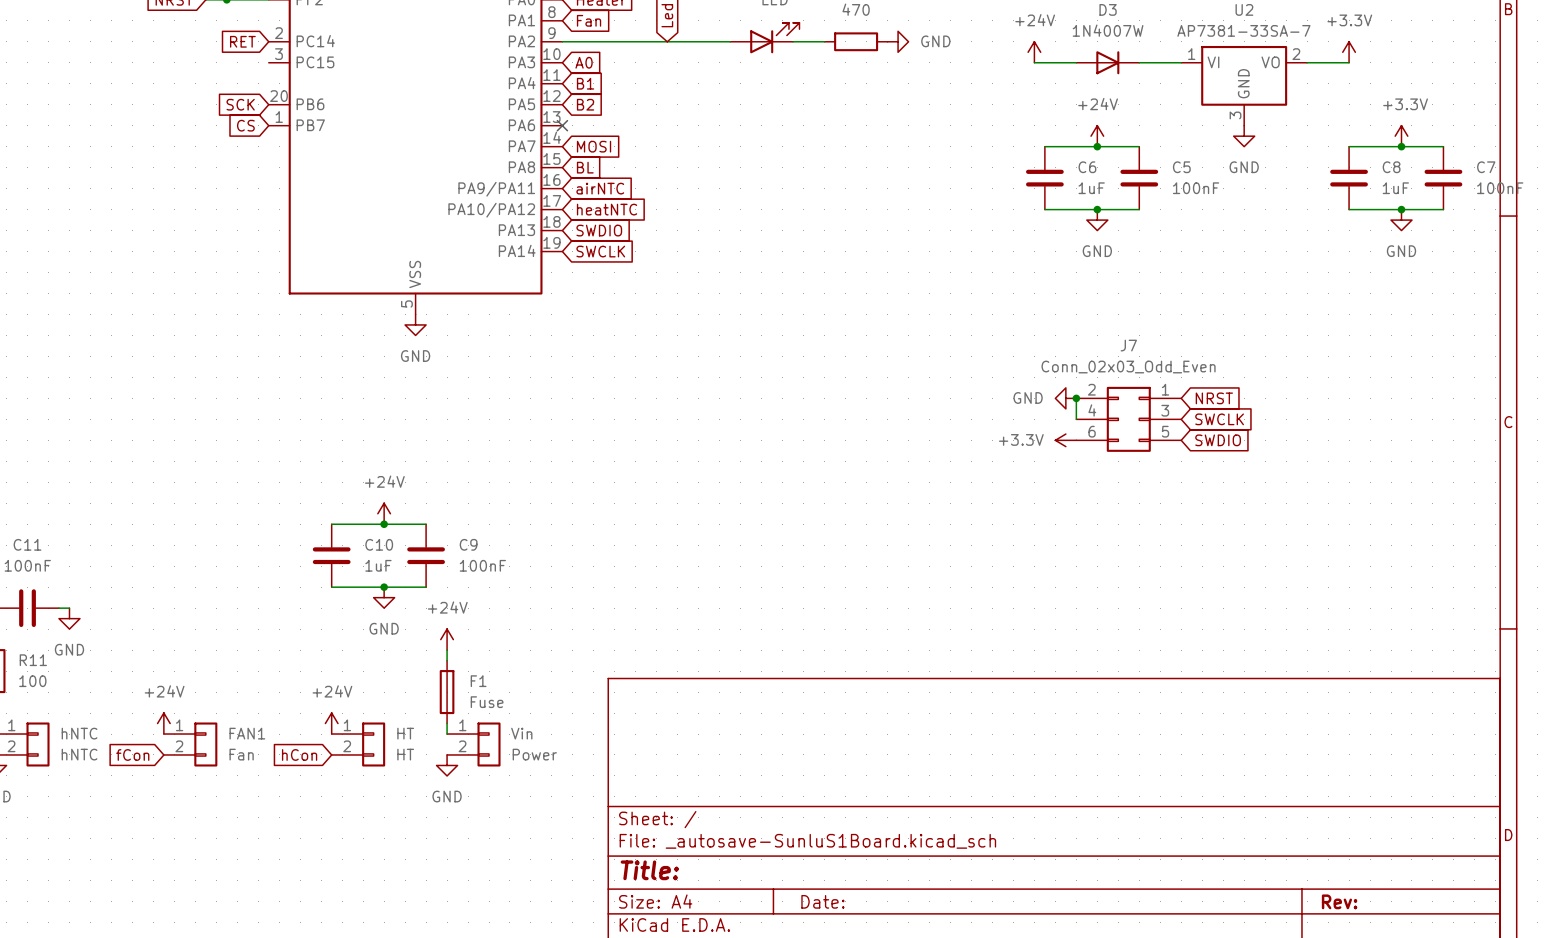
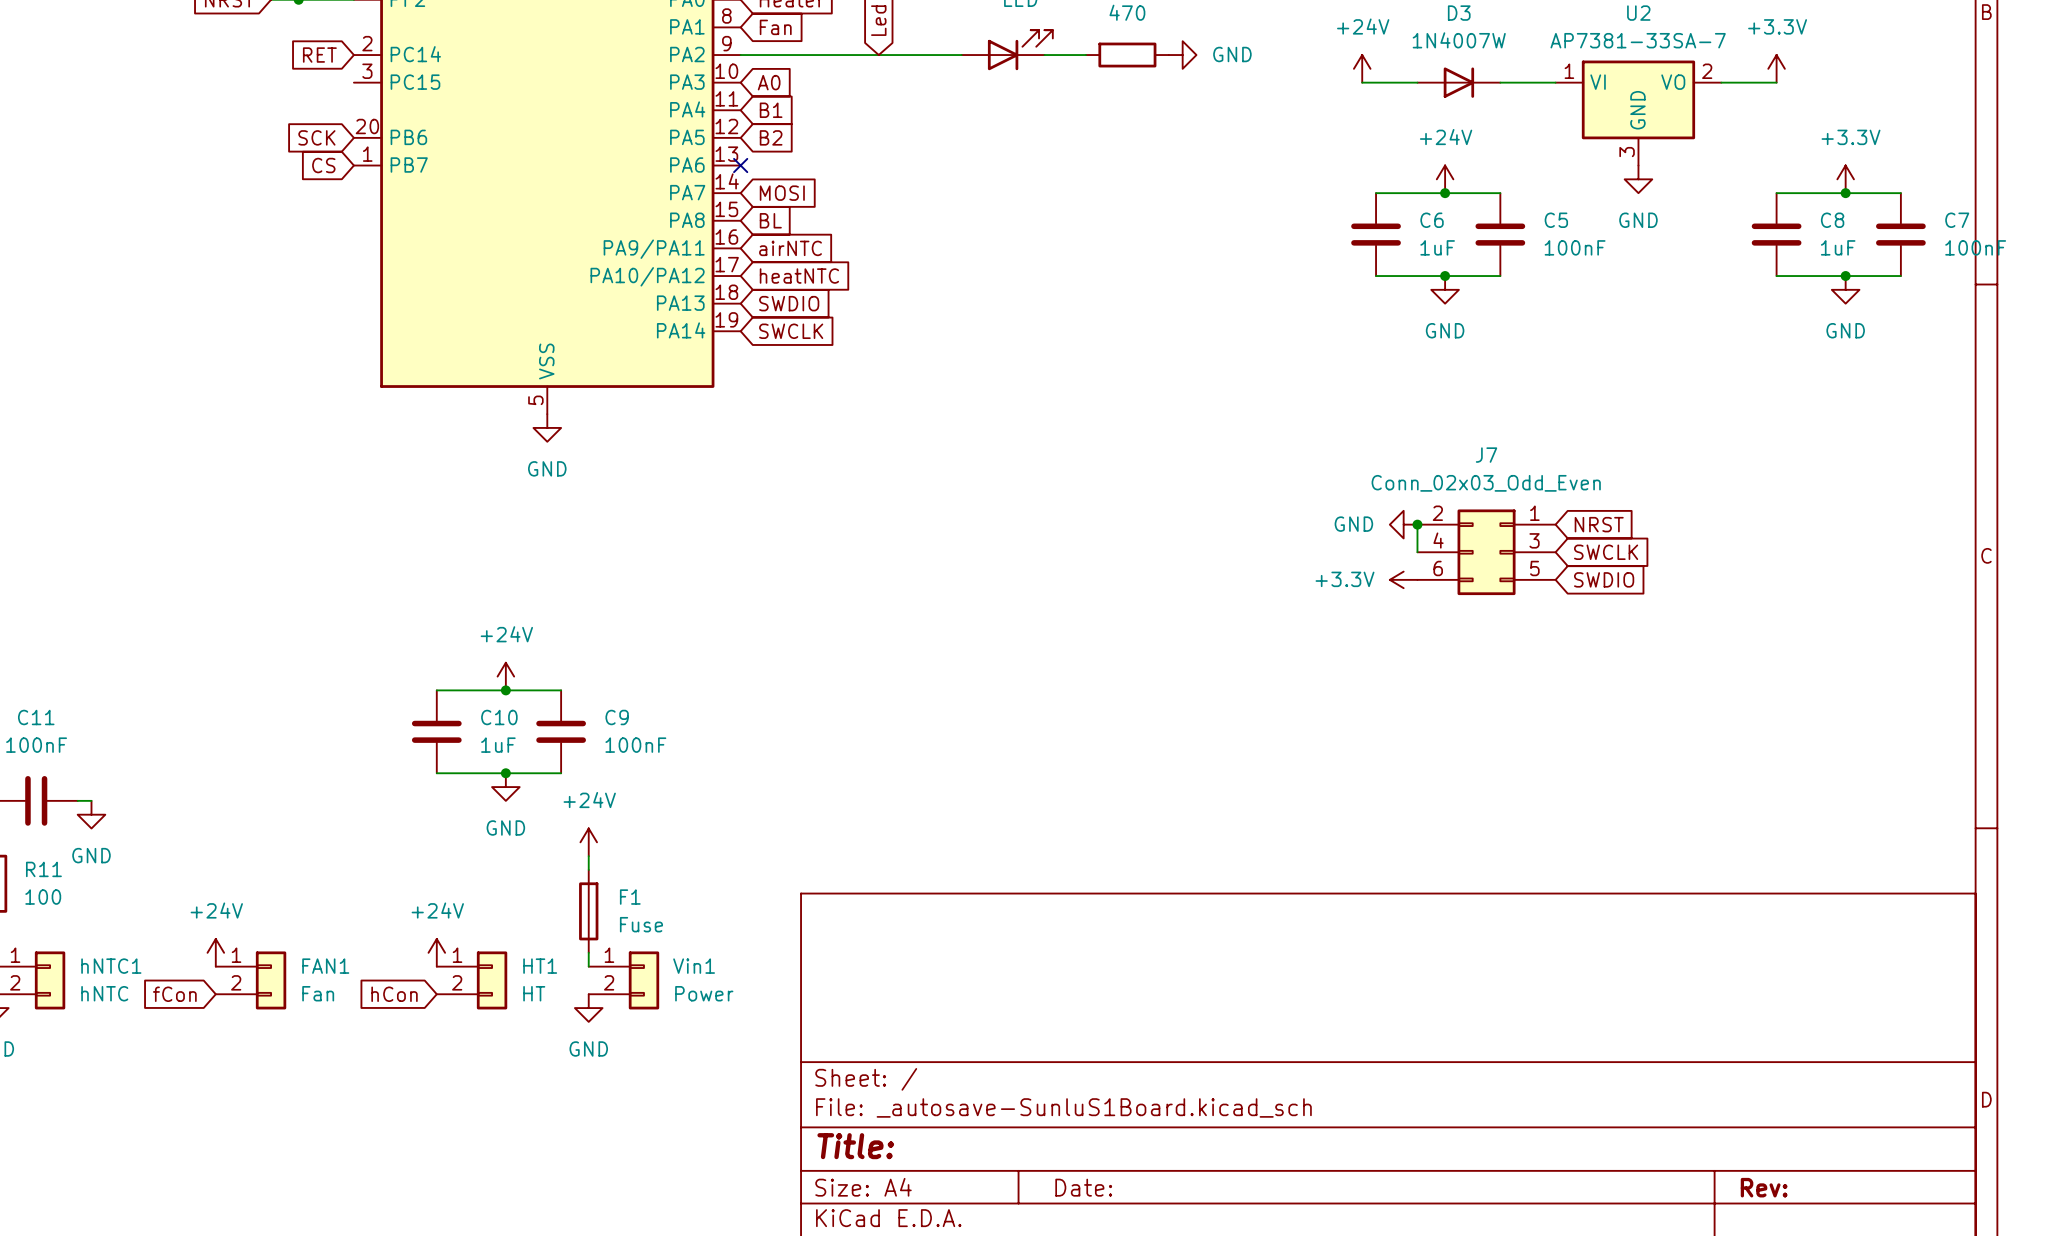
hNTC name: hNTC (79, 733) -> hNTC1 (111, 966)
HT name: HT (405, 733) -> HT1 (540, 966)
Vin name: Vin (521, 733) -> Vin1 (694, 966)

